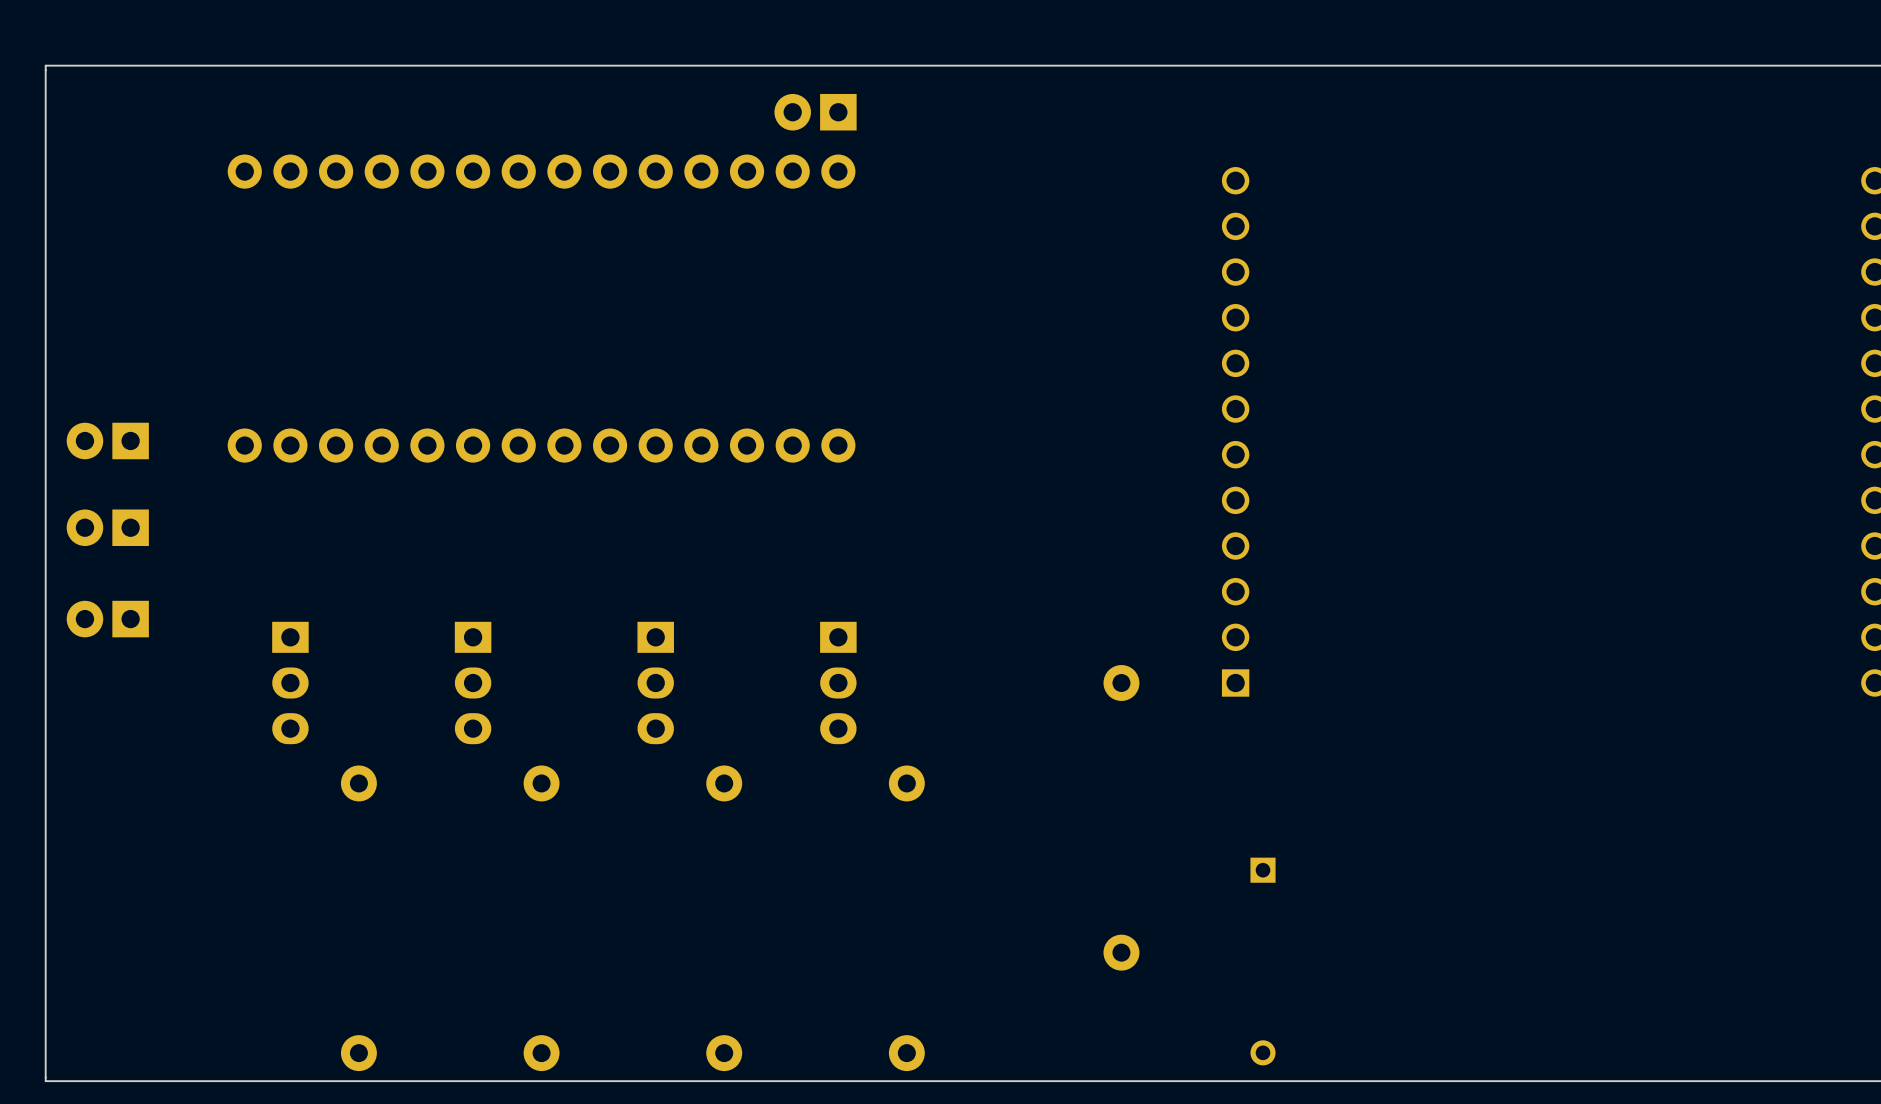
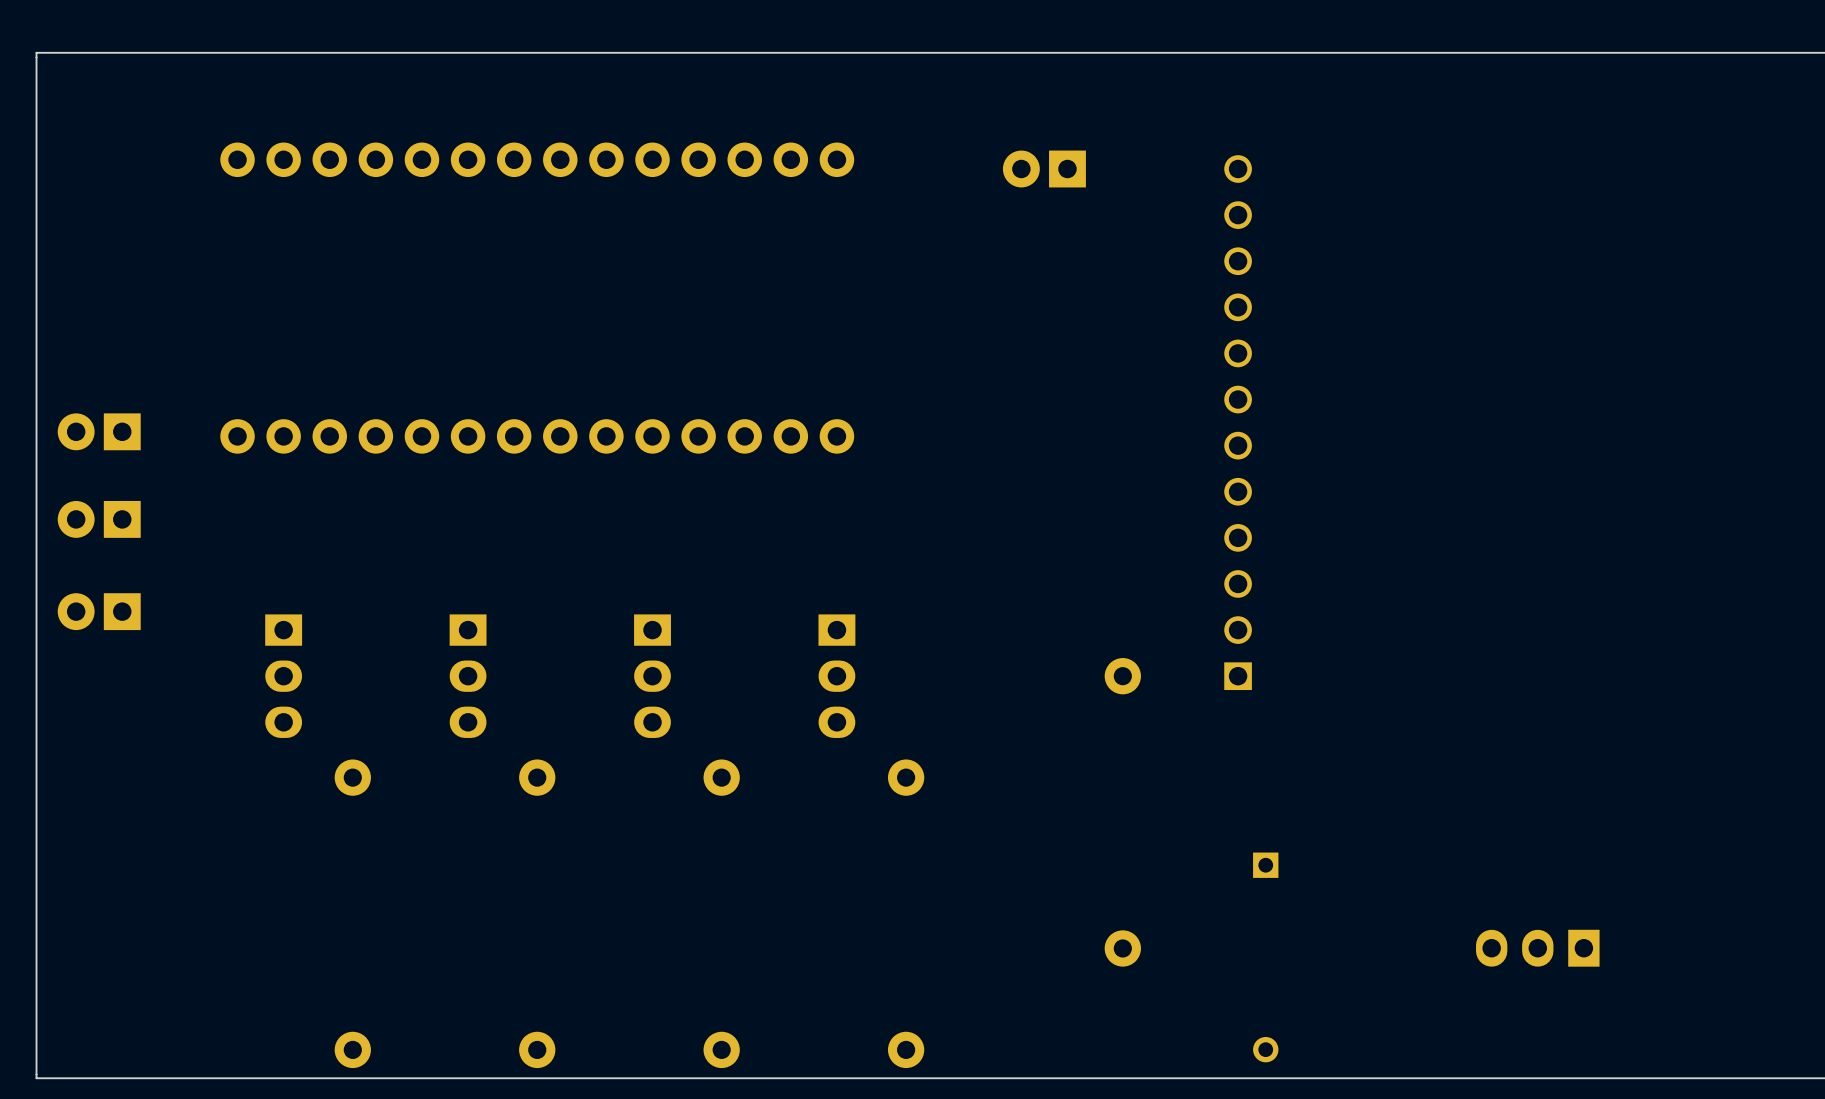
part position: (815, 112) -> (1044, 169)
part: none -> (1537, 948)

